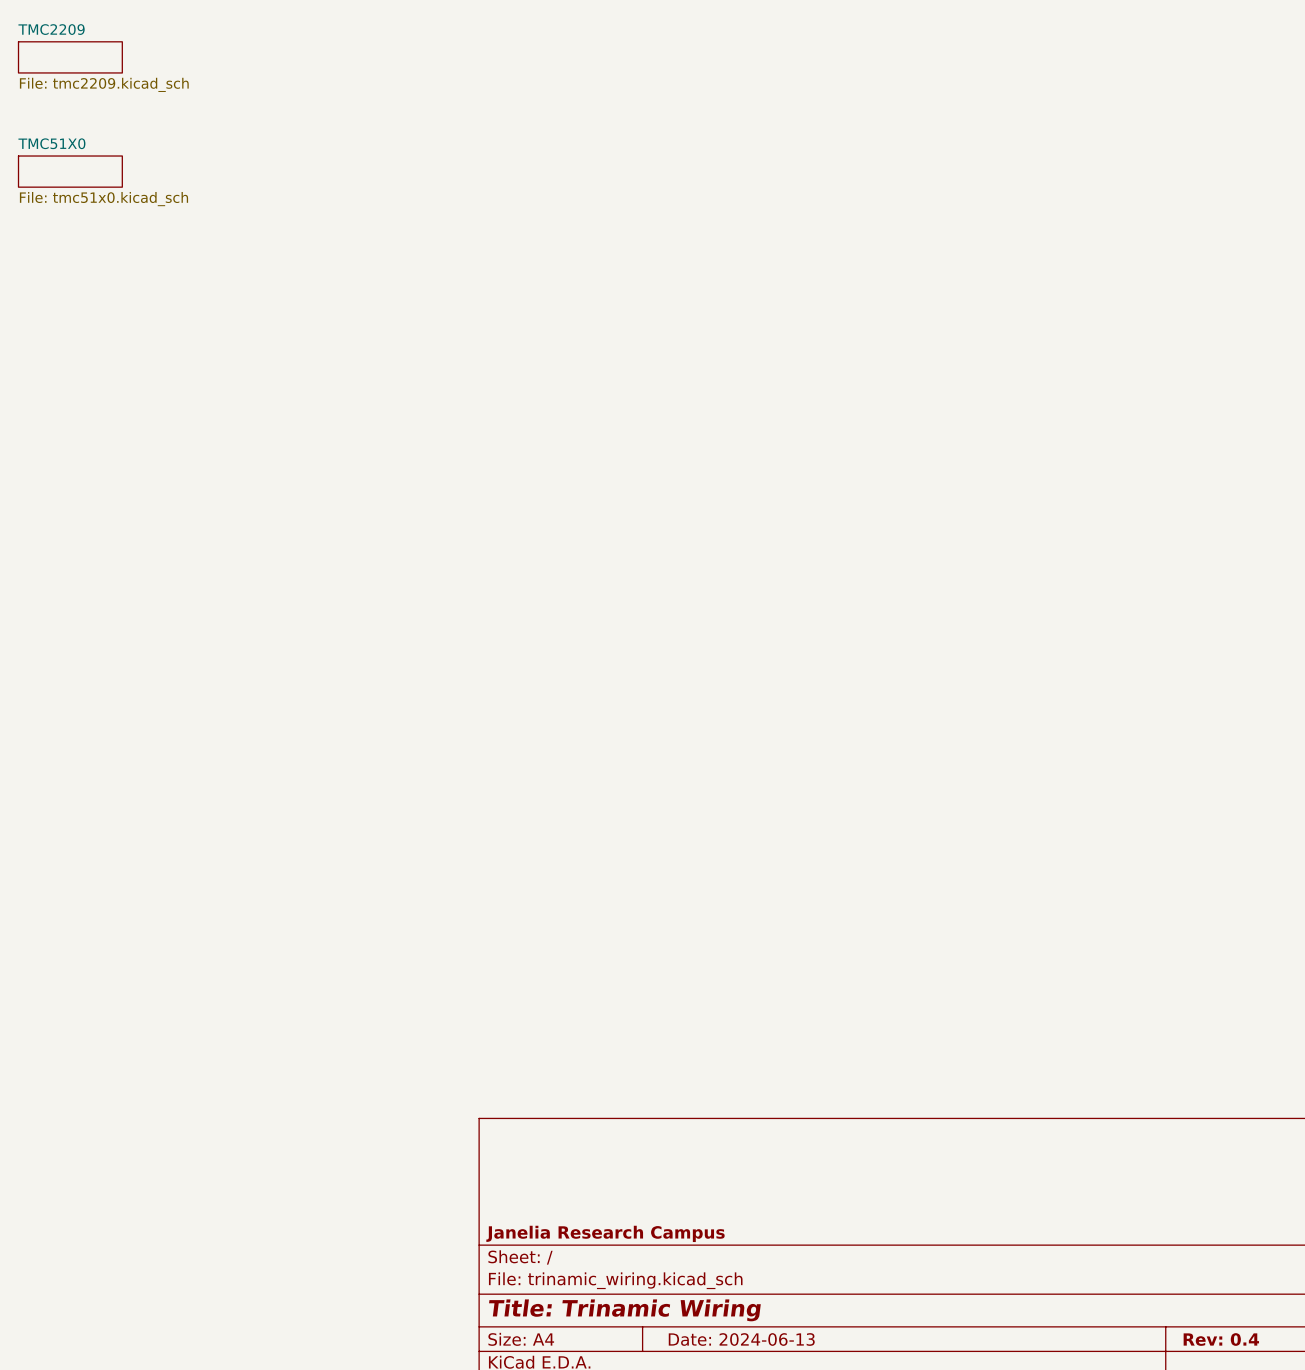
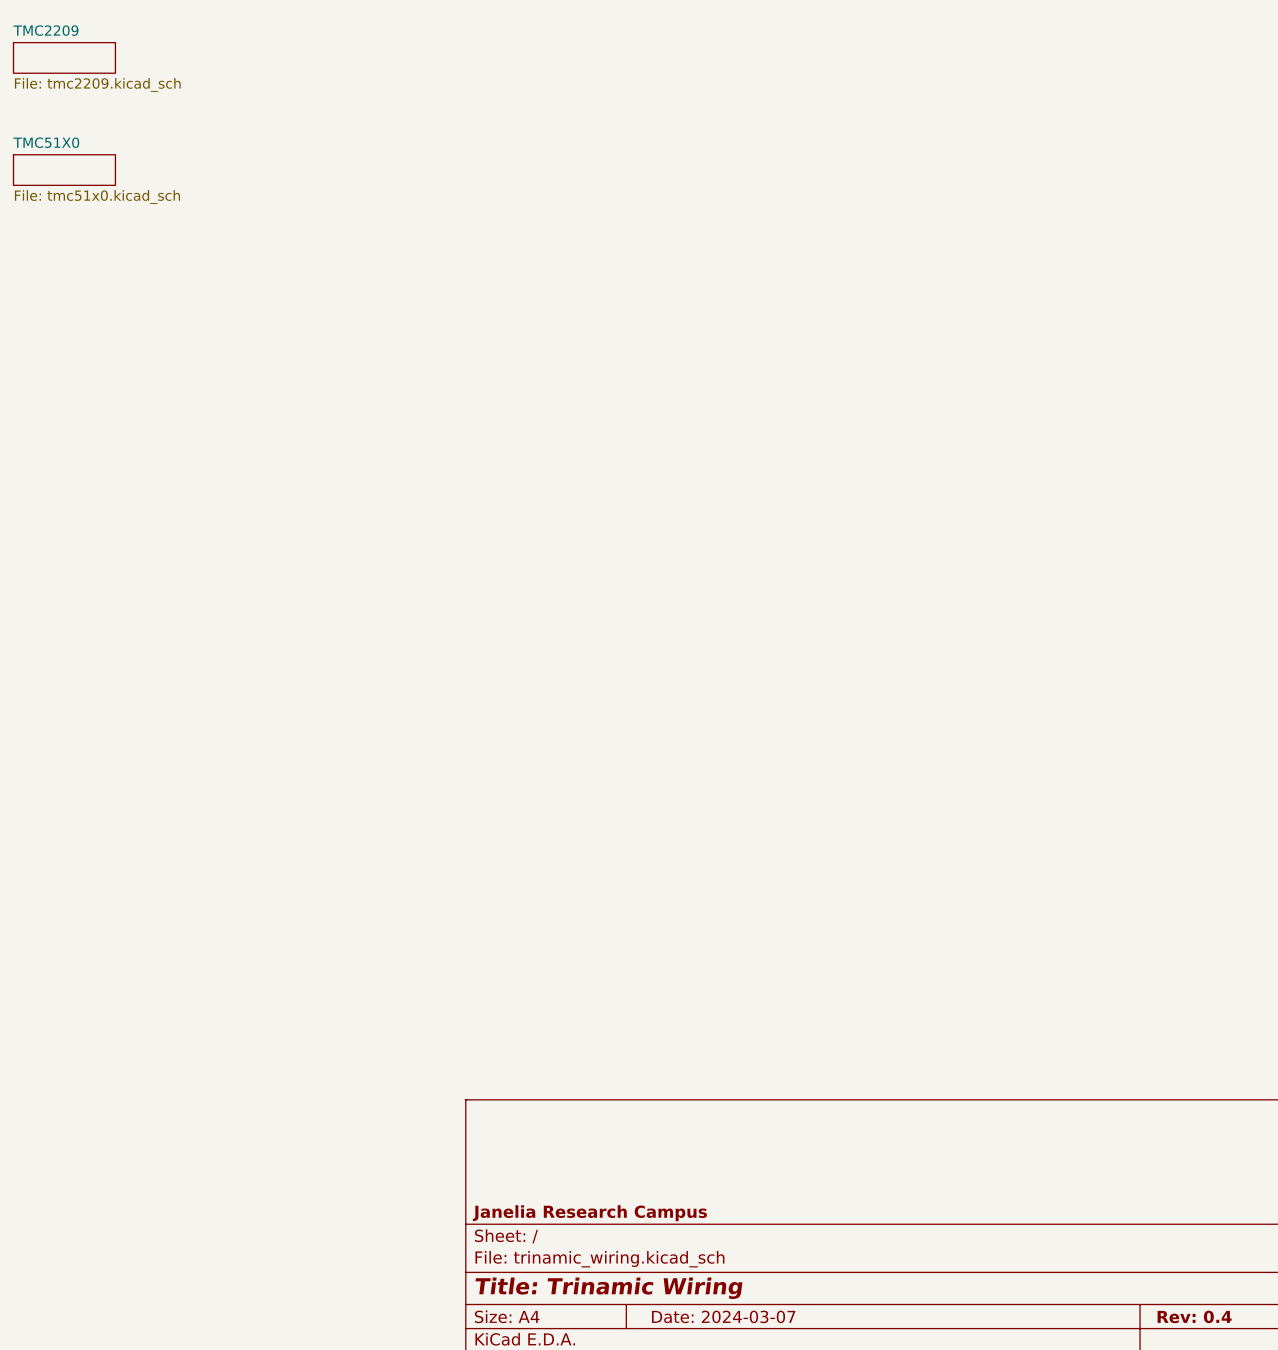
title block: Date: 2024-06-13 (741, 1339) -> Date: 2024-03-07 (723, 1316)

